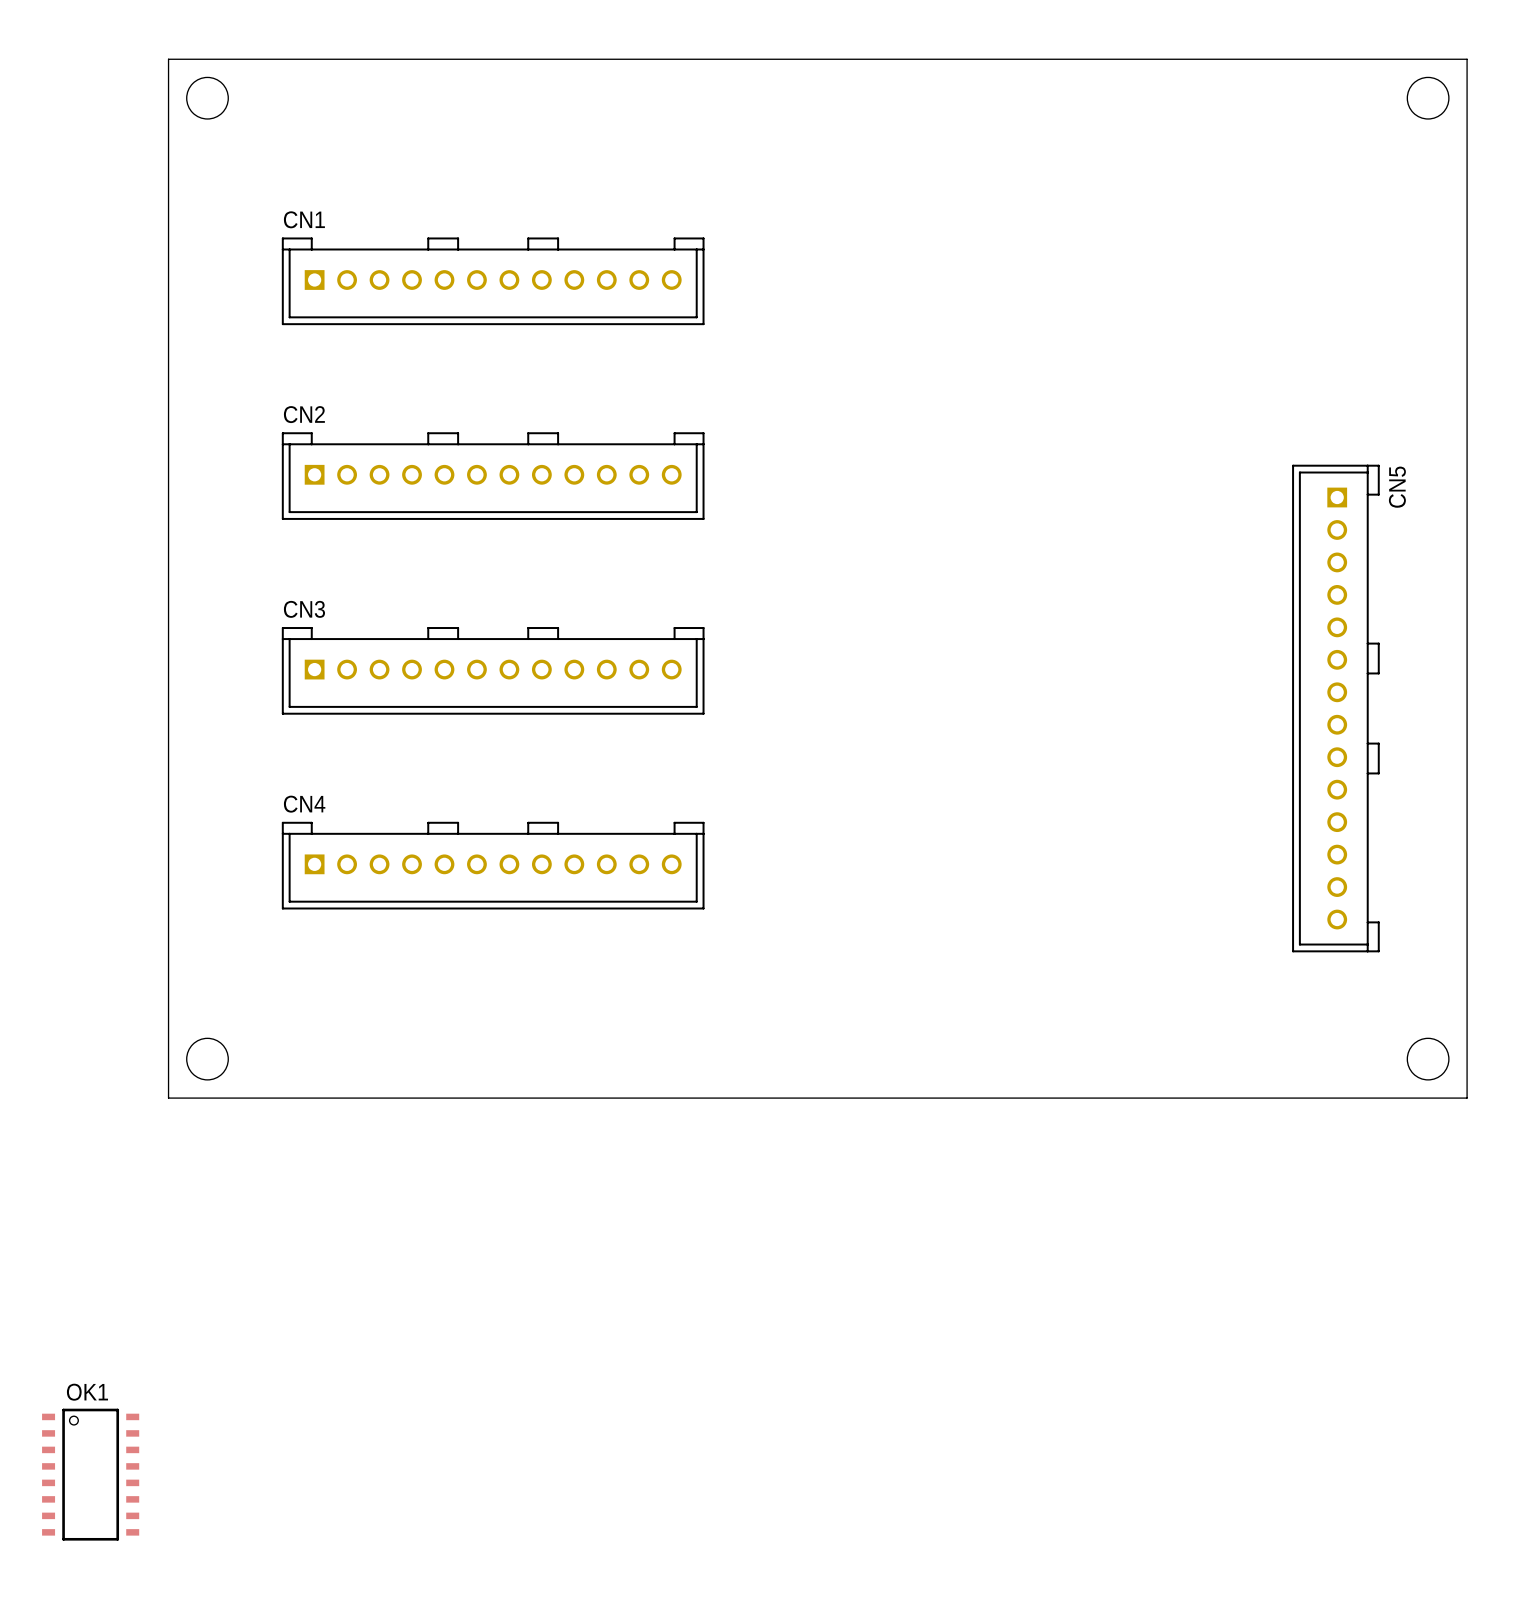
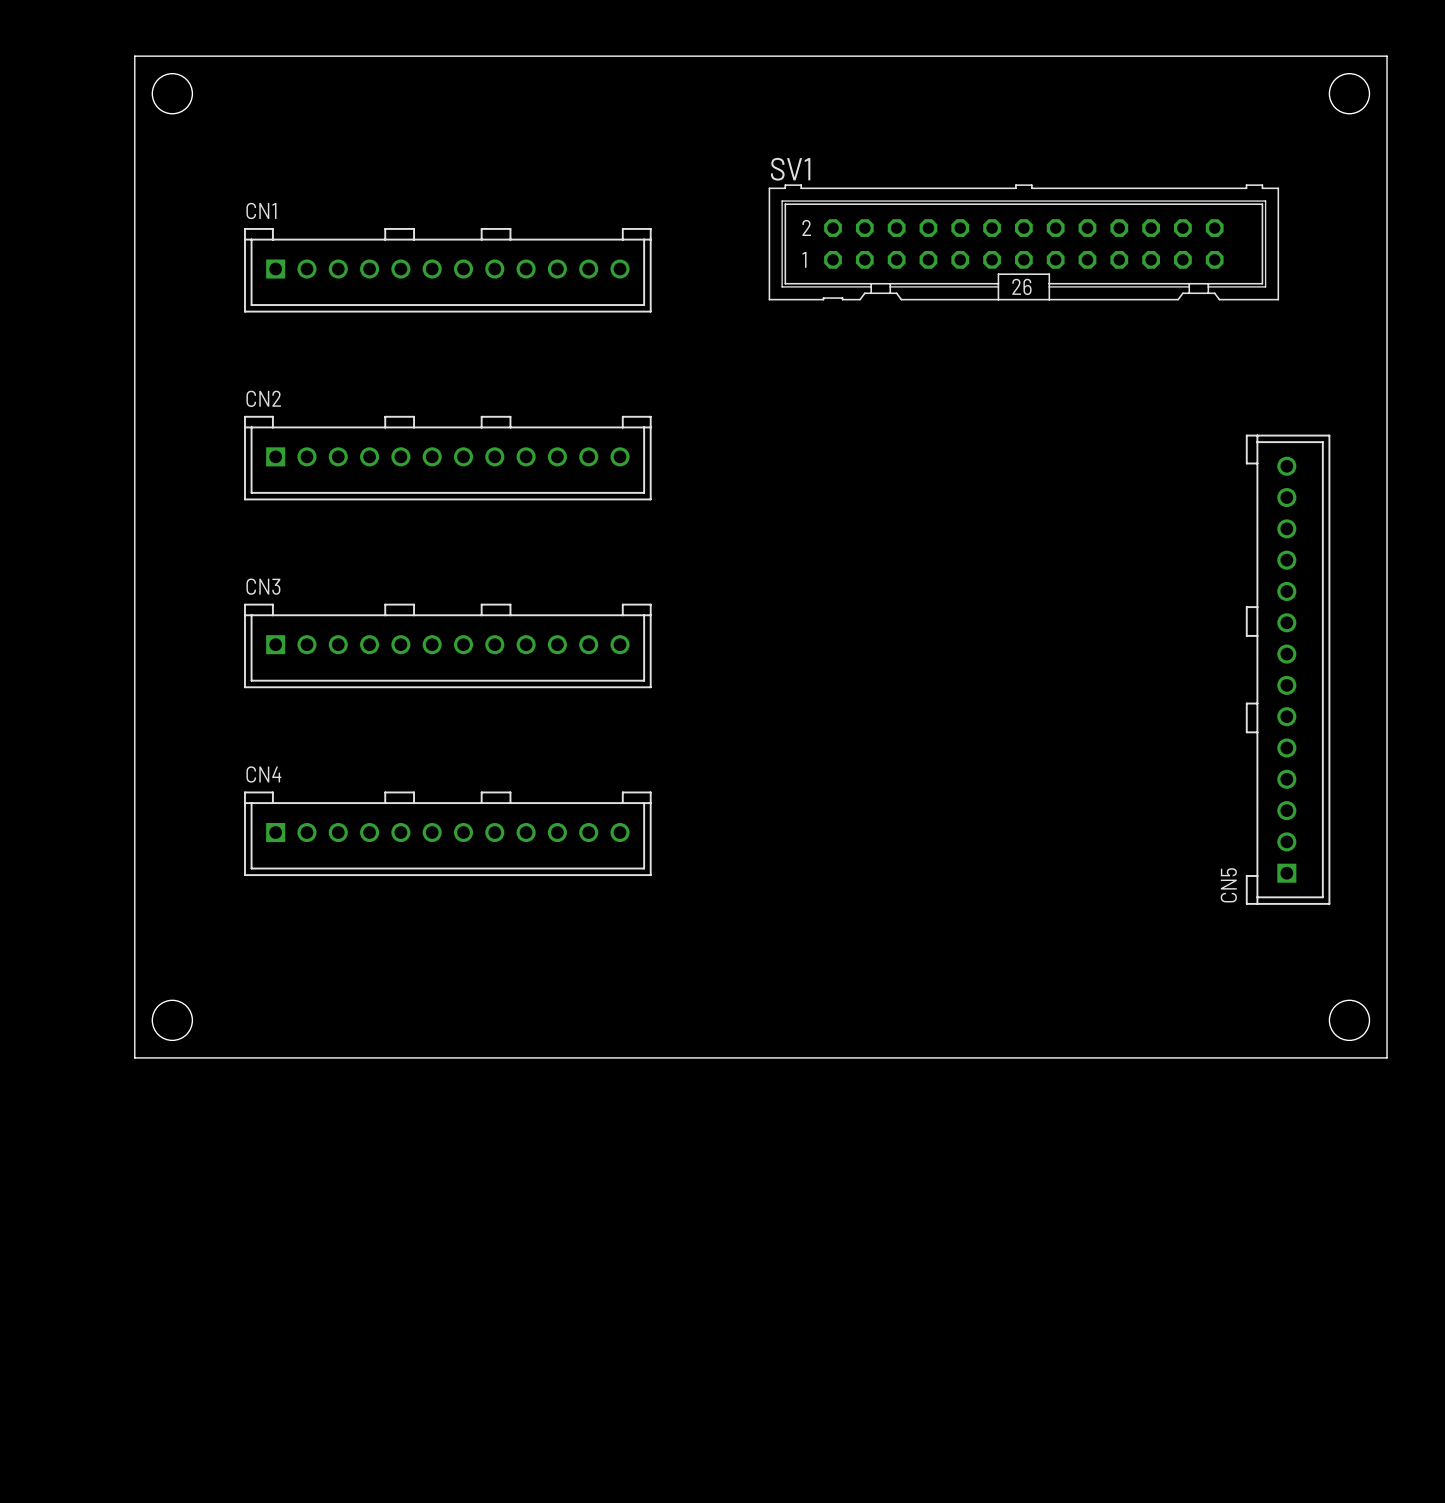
SV1: none -> (1023, 242)
CN5 rotation: 0° (1335, 708) -> 180° (1288, 669)
OK1: (90, 1474) -> none

